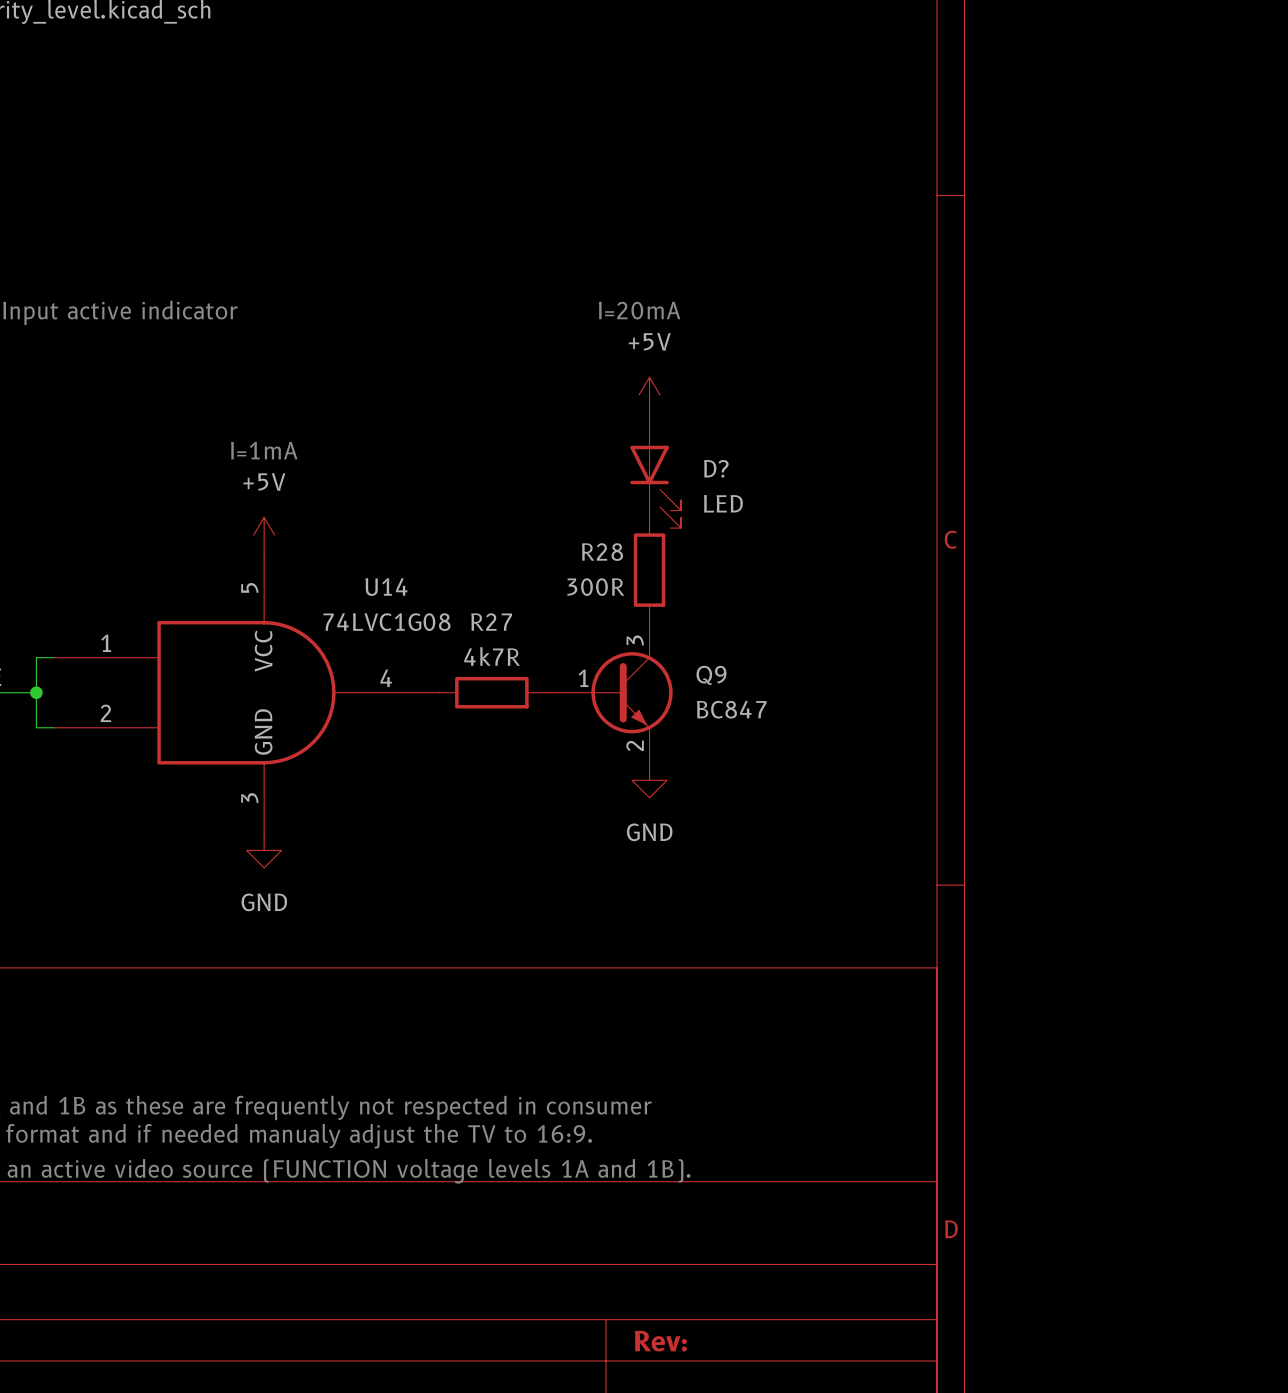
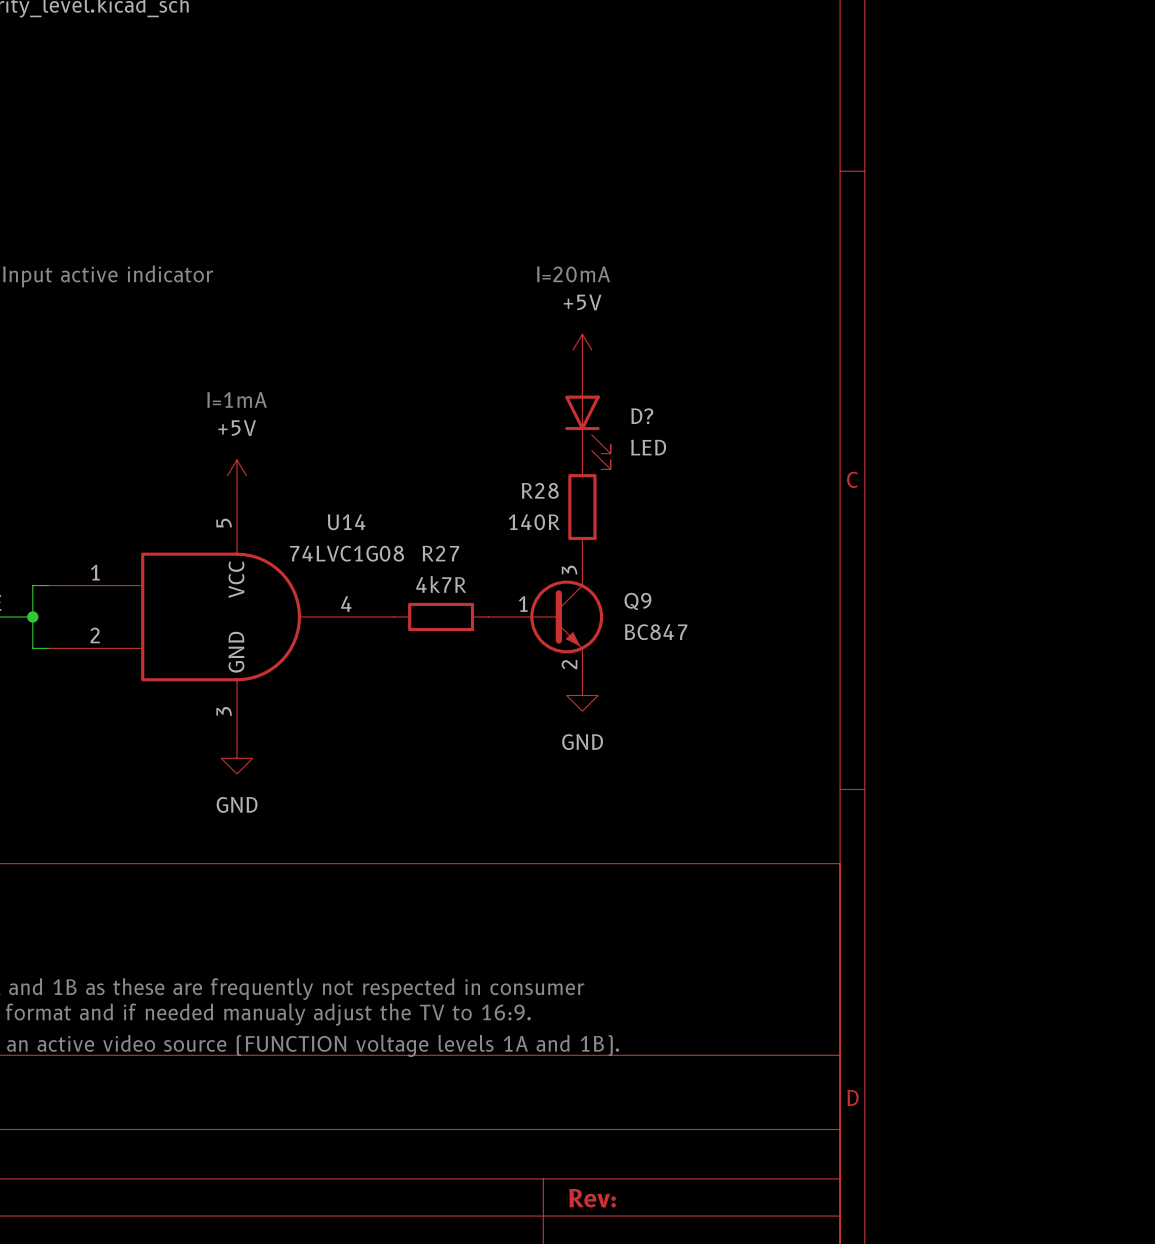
R28 value: 300R (595, 587) -> 140R (534, 522)

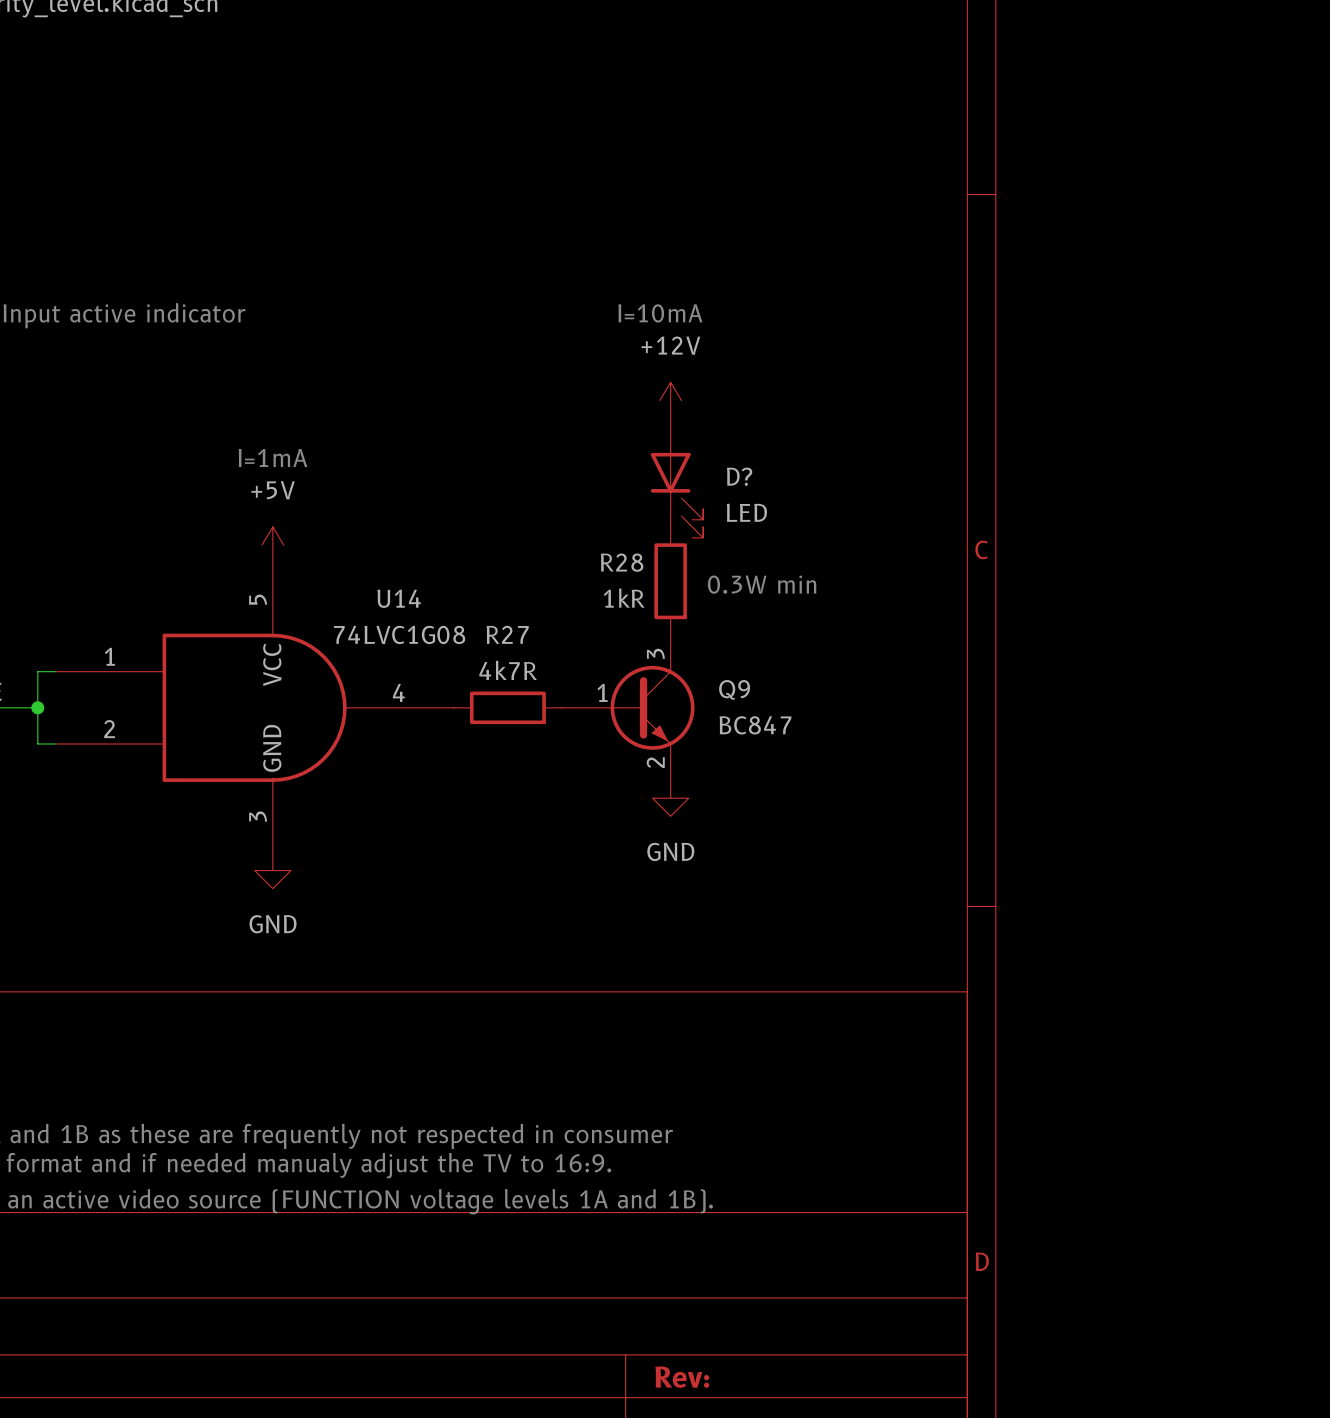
text: I=20mA (573, 274) -> I=10mA (660, 313)
power symbol: +5V (582, 350) -> +12V (670, 400)
text: none -> 0.3W min (762, 584)
R28 value: 140R (534, 522) -> 1kR (624, 598)

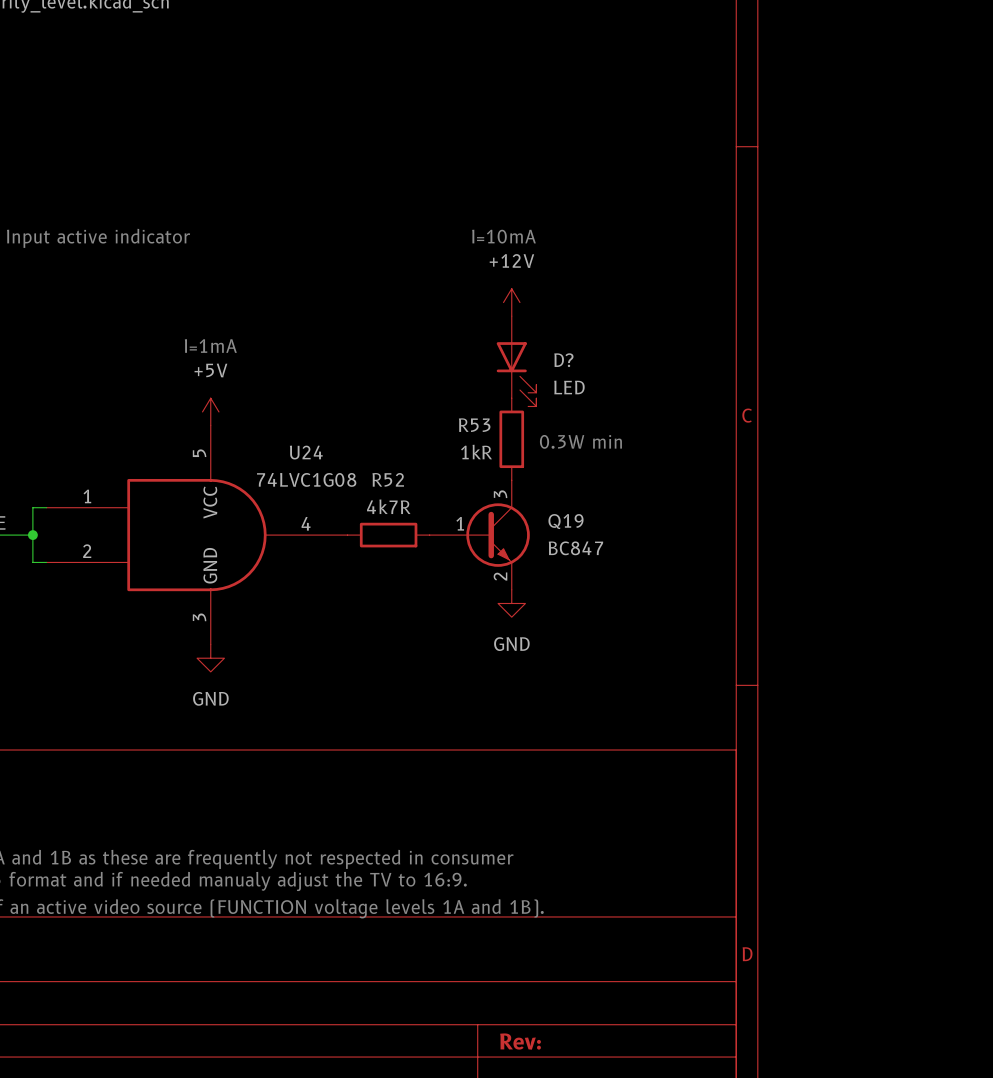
R28 name: R28 (622, 562) -> R53 (474, 425)
U14 name: U14 (399, 598) -> U24 (306, 452)
R27 name: R27 (507, 634) -> R52 (388, 479)
Q9 name: Q9 (734, 689) -> Q19 (565, 521)

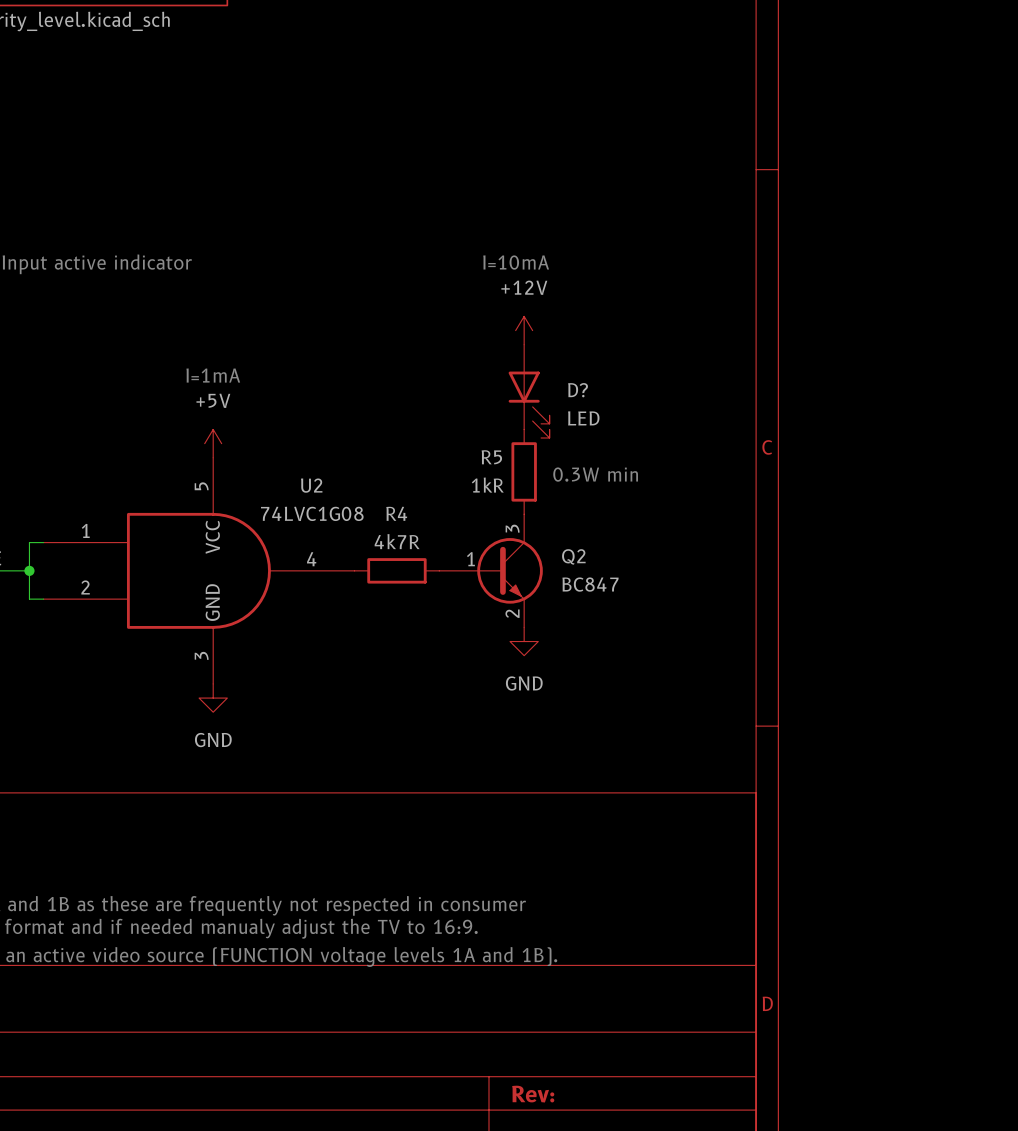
R53 name: R53 (474, 425) -> R5 (491, 457)
U24 name: U24 (306, 452) -> U2 (311, 485)
R52 name: R52 (388, 479) -> R4 (396, 513)
Q19 name: Q19 (565, 521) -> Q2 (573, 556)

